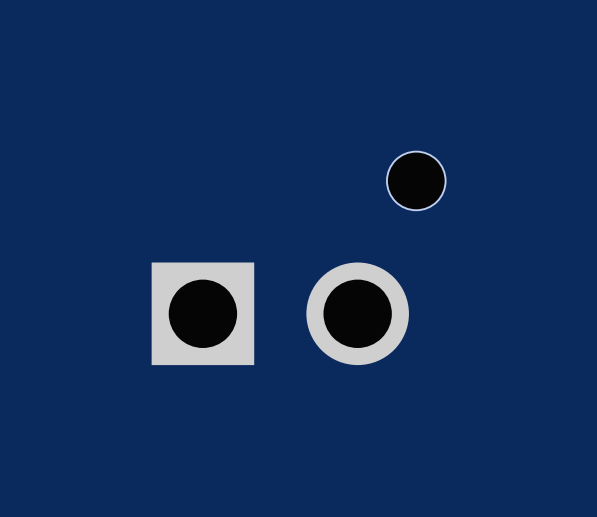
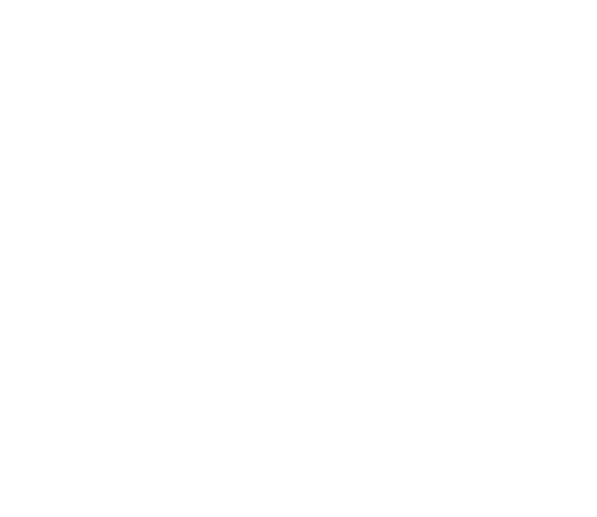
part: (298, 258) -> none

